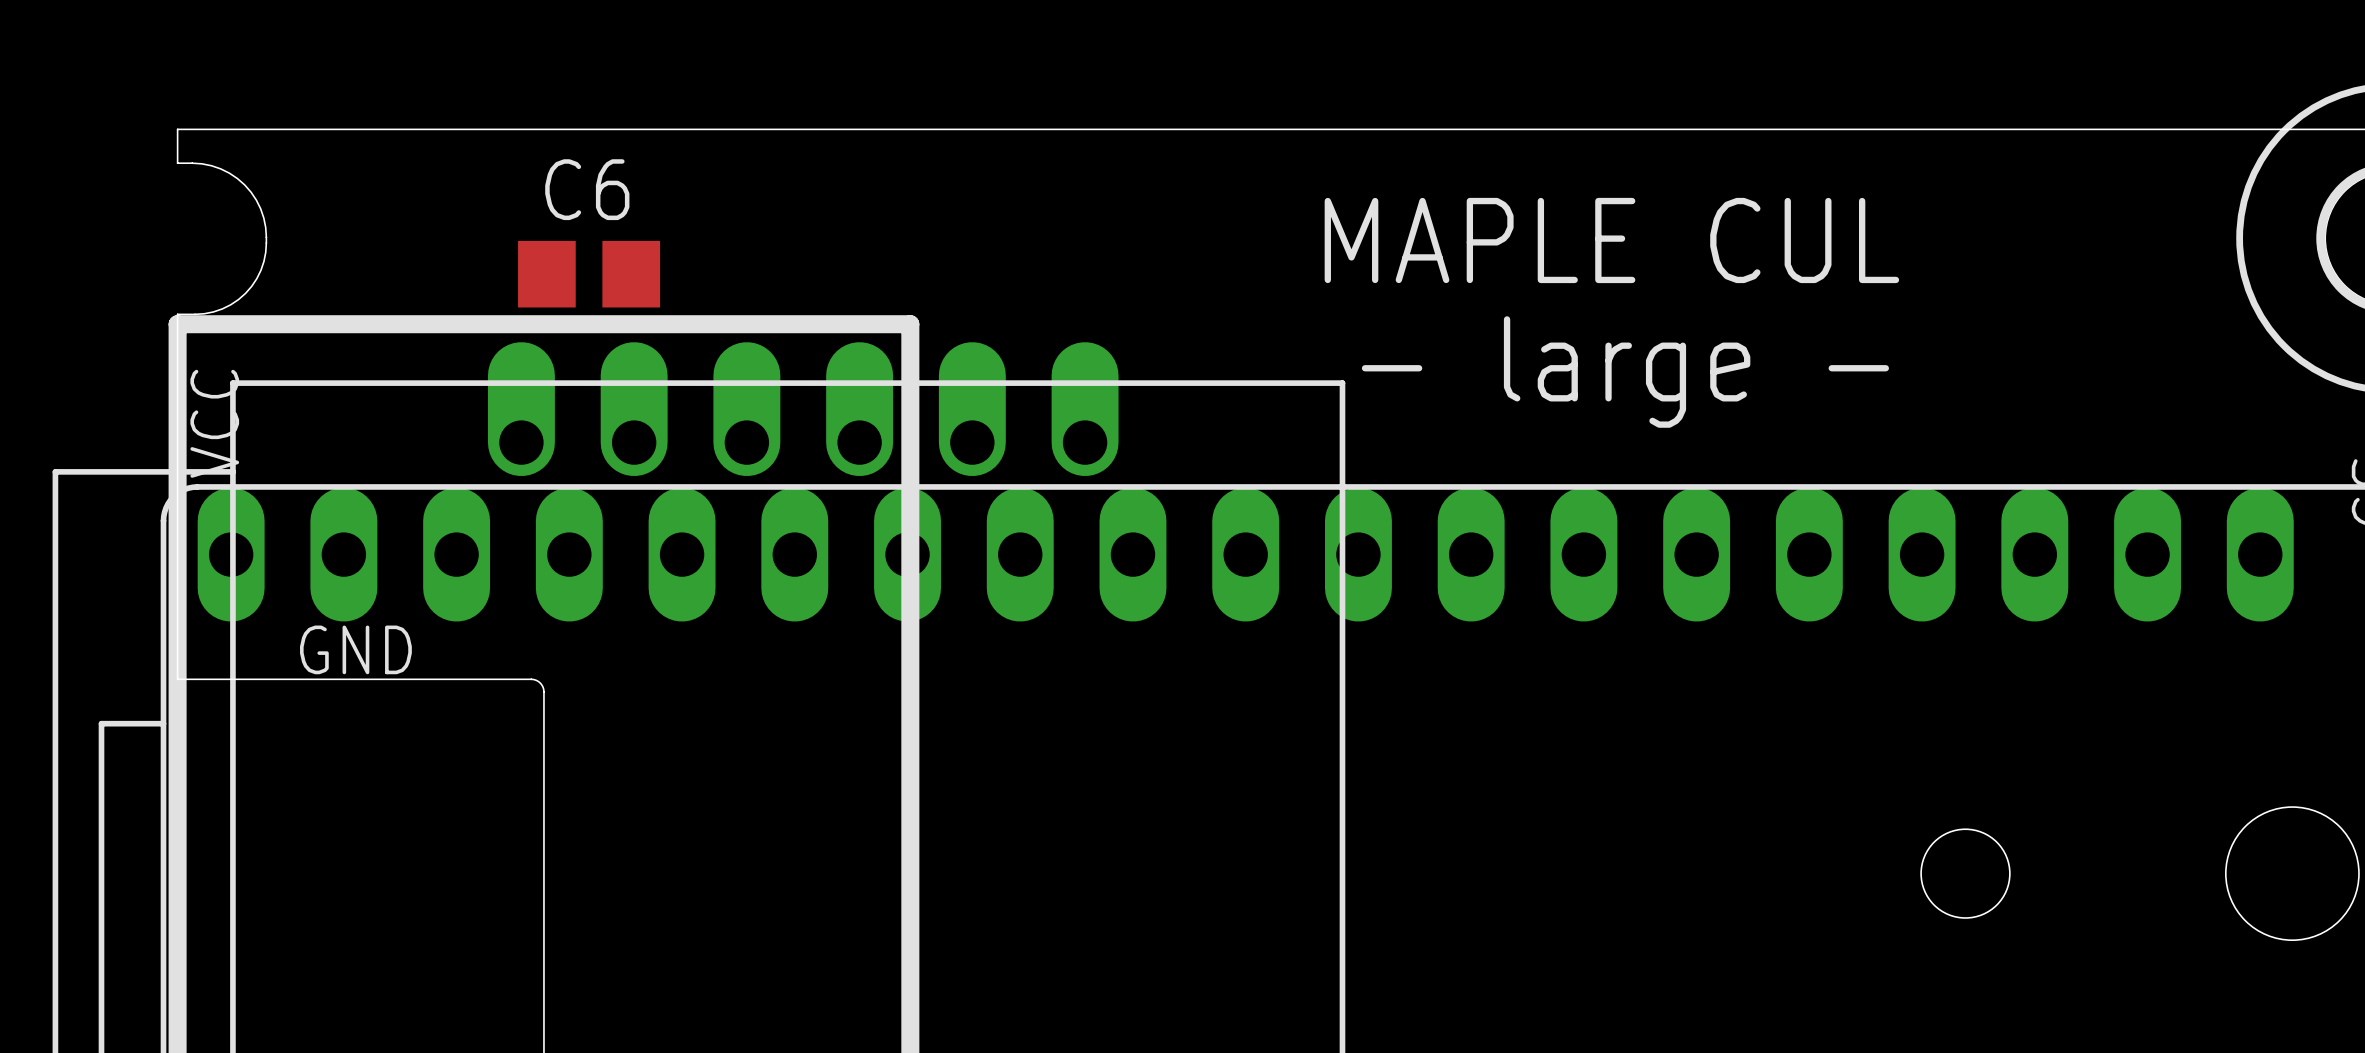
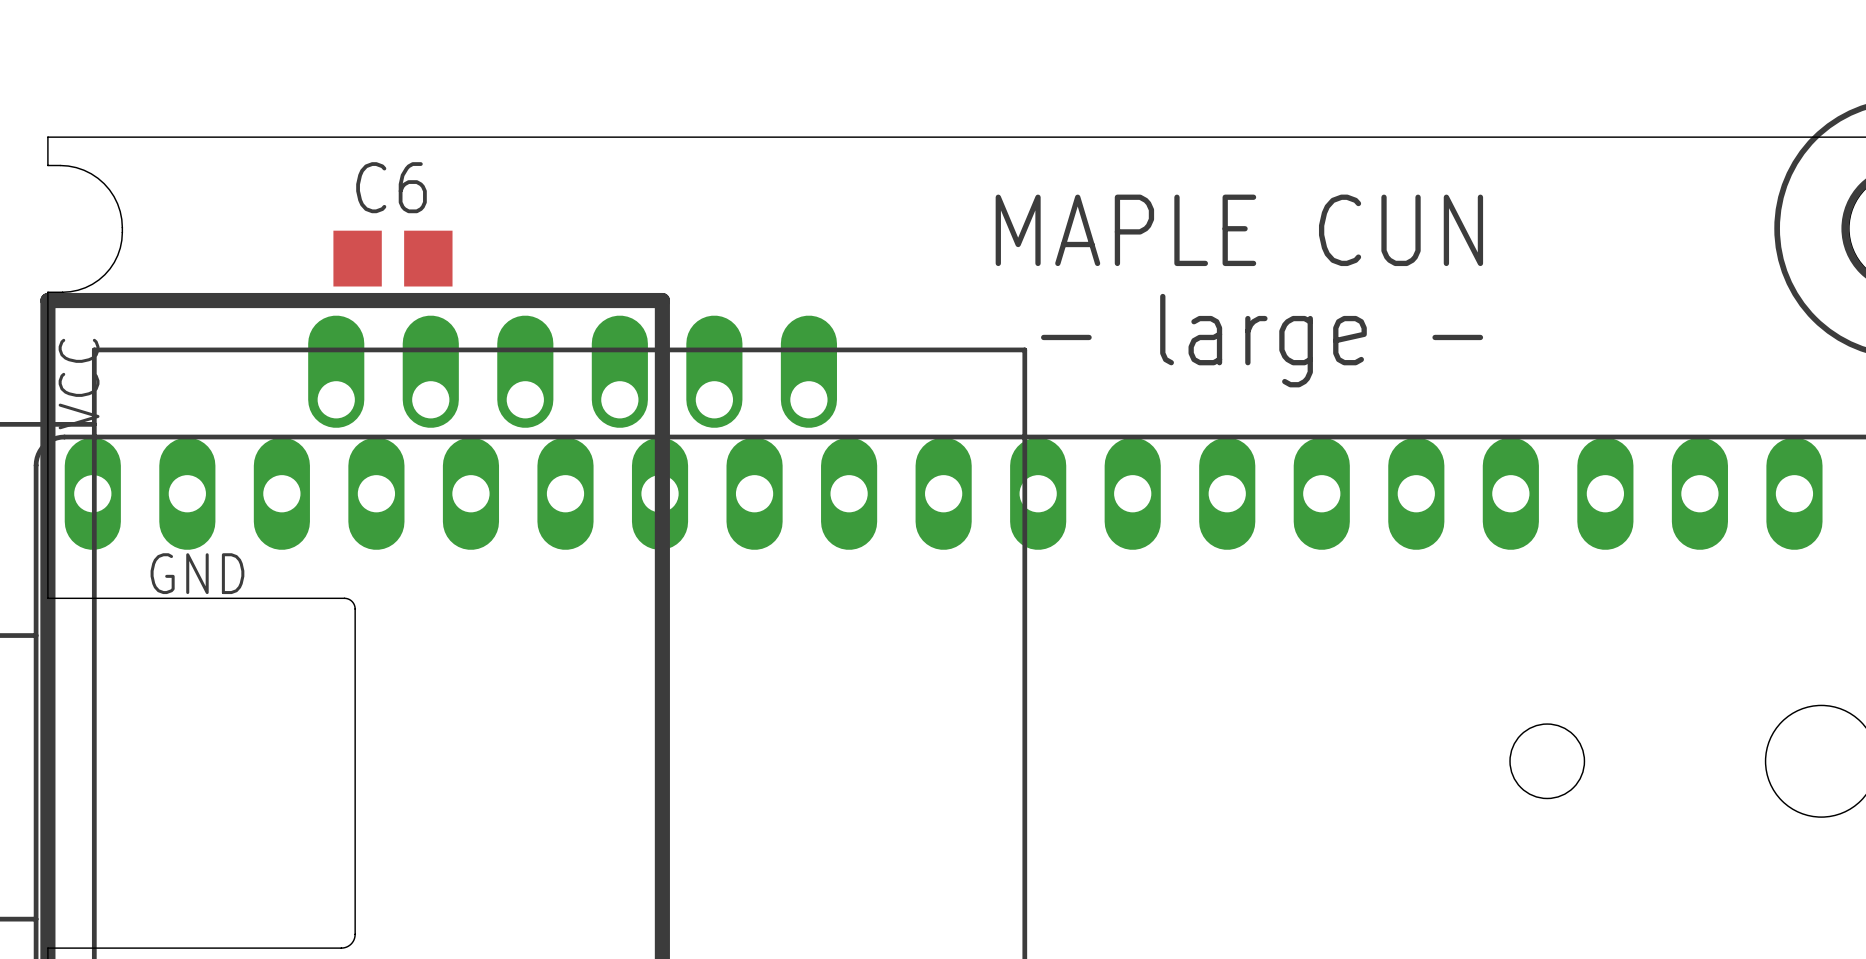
text: MAPLE CUL (1611, 240) -> MAPLE CUN (1239, 230)

